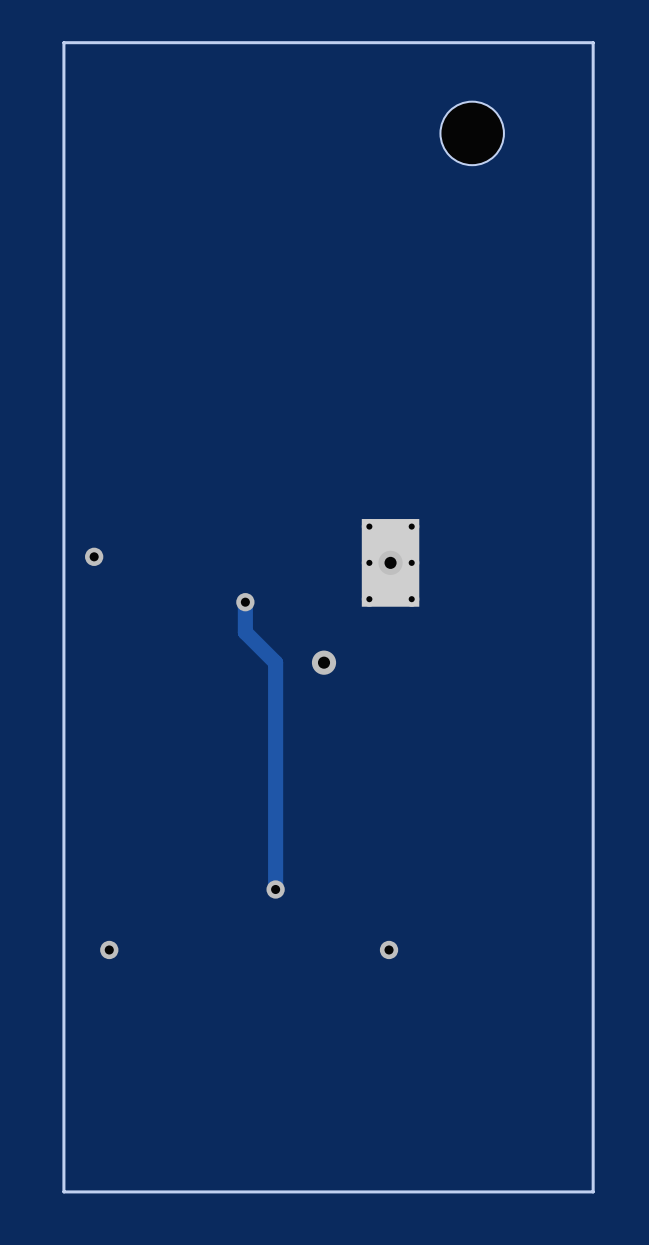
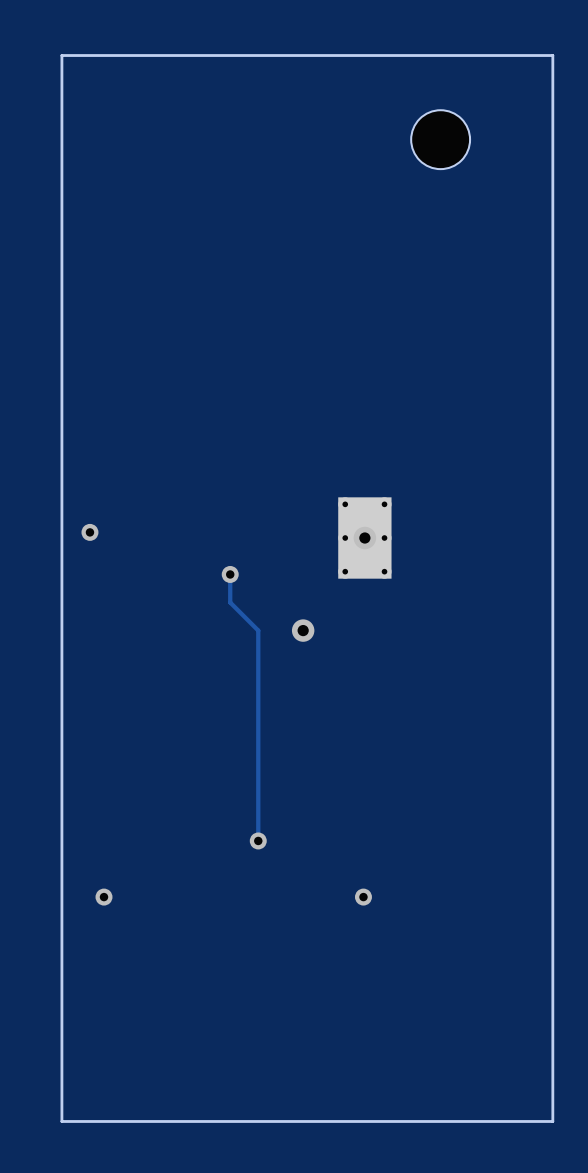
track width: thick (245, 602) (245, 632) (275, 662) (275, 889) -> thin (230, 574) (230, 602) (258, 630) (258, 840)

